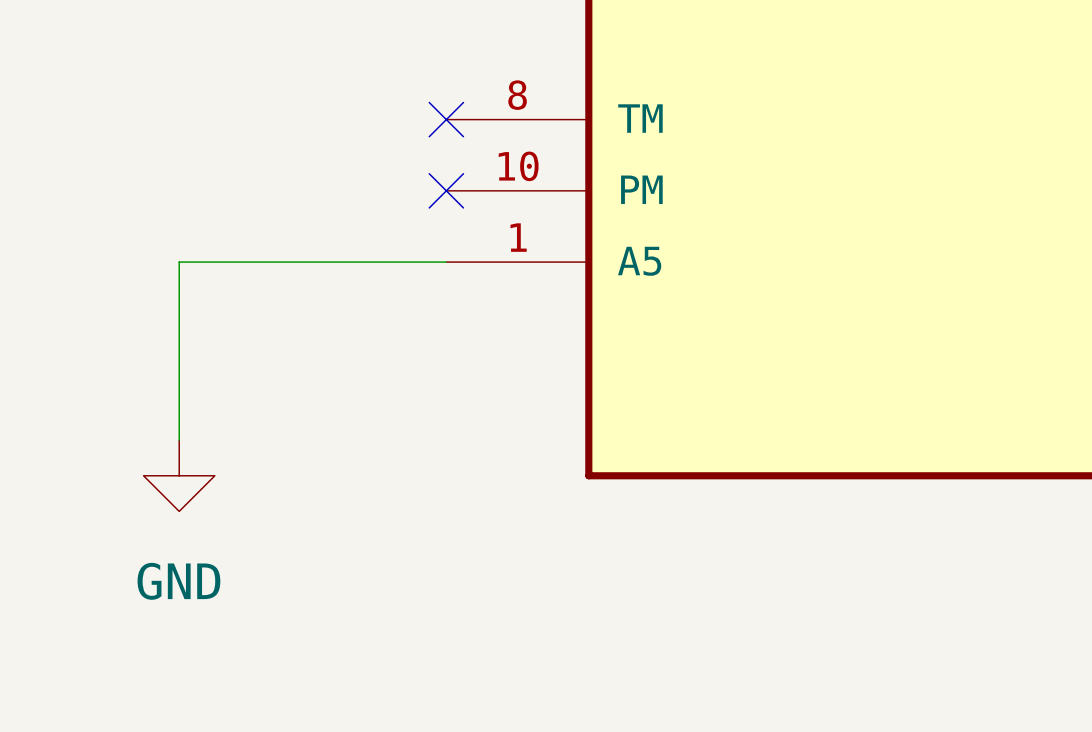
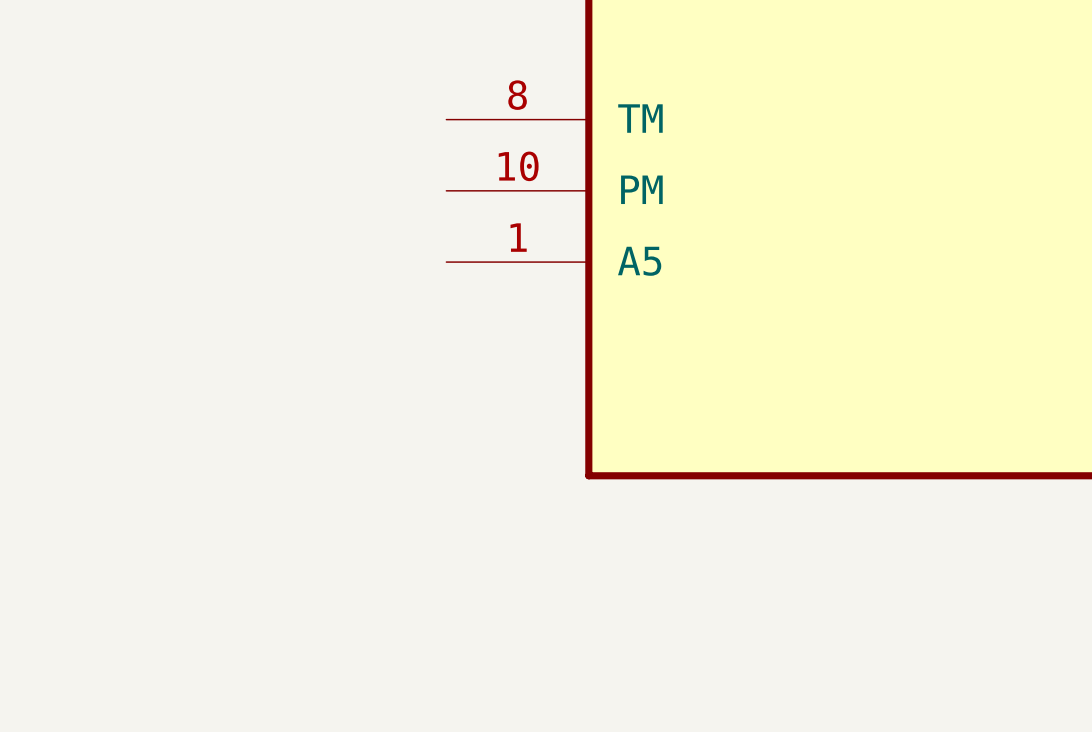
no-connect mark: (446, 119) -> none
no-connect mark: (446, 190) -> none
wire: (446, 262) (179, 262) (179, 440) -> none
power symbol: GND (179, 475) -> none

